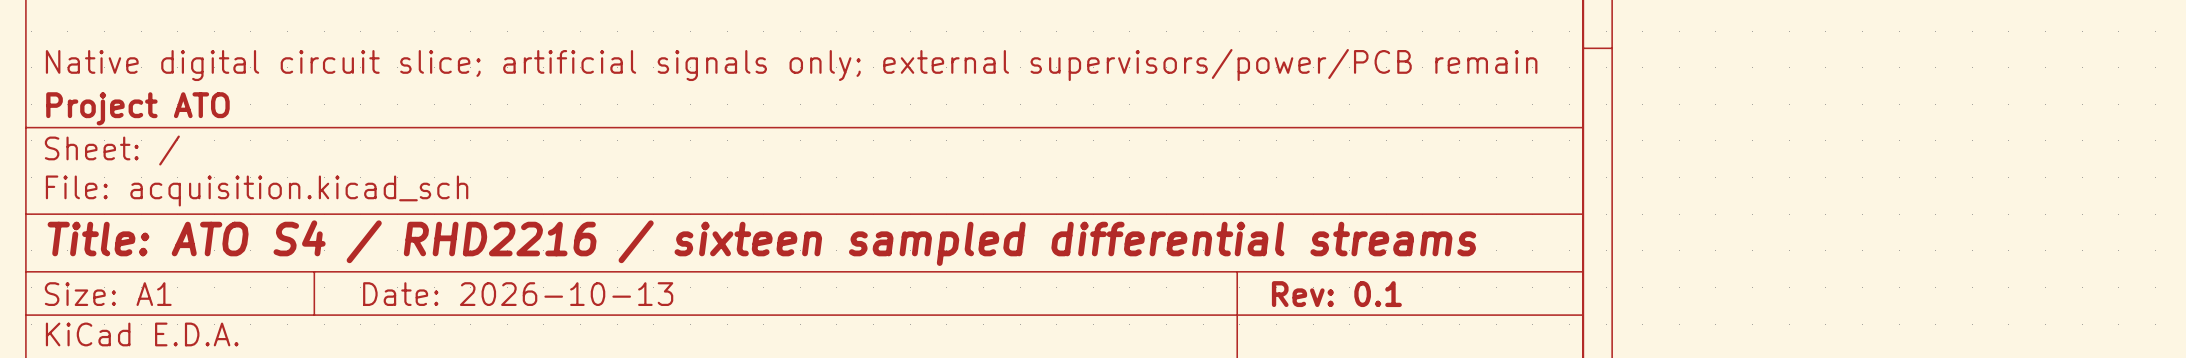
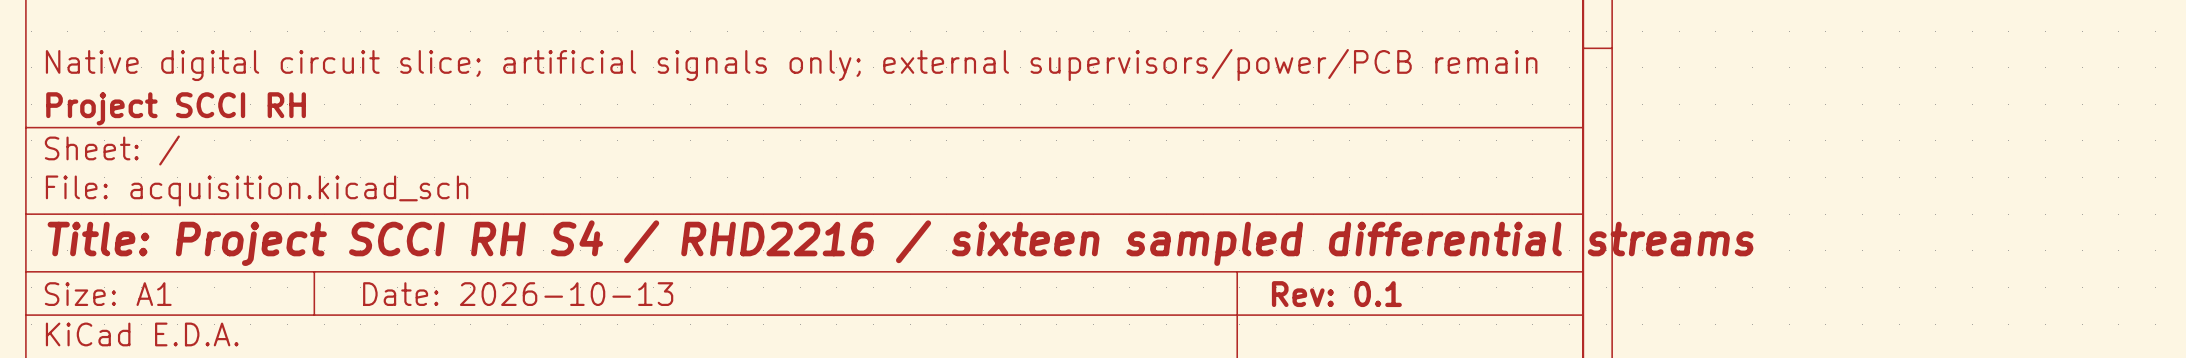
title block: Project ATO (137, 108) -> Project SCCI RH (176, 108)
title block: Title: ATO S4 / RHD2216 / sixteen sampled differential streams (761, 243) -> Title: Project SCCI RH S4 / RHD2216 / sixteen sampled differential streams (900, 243)

